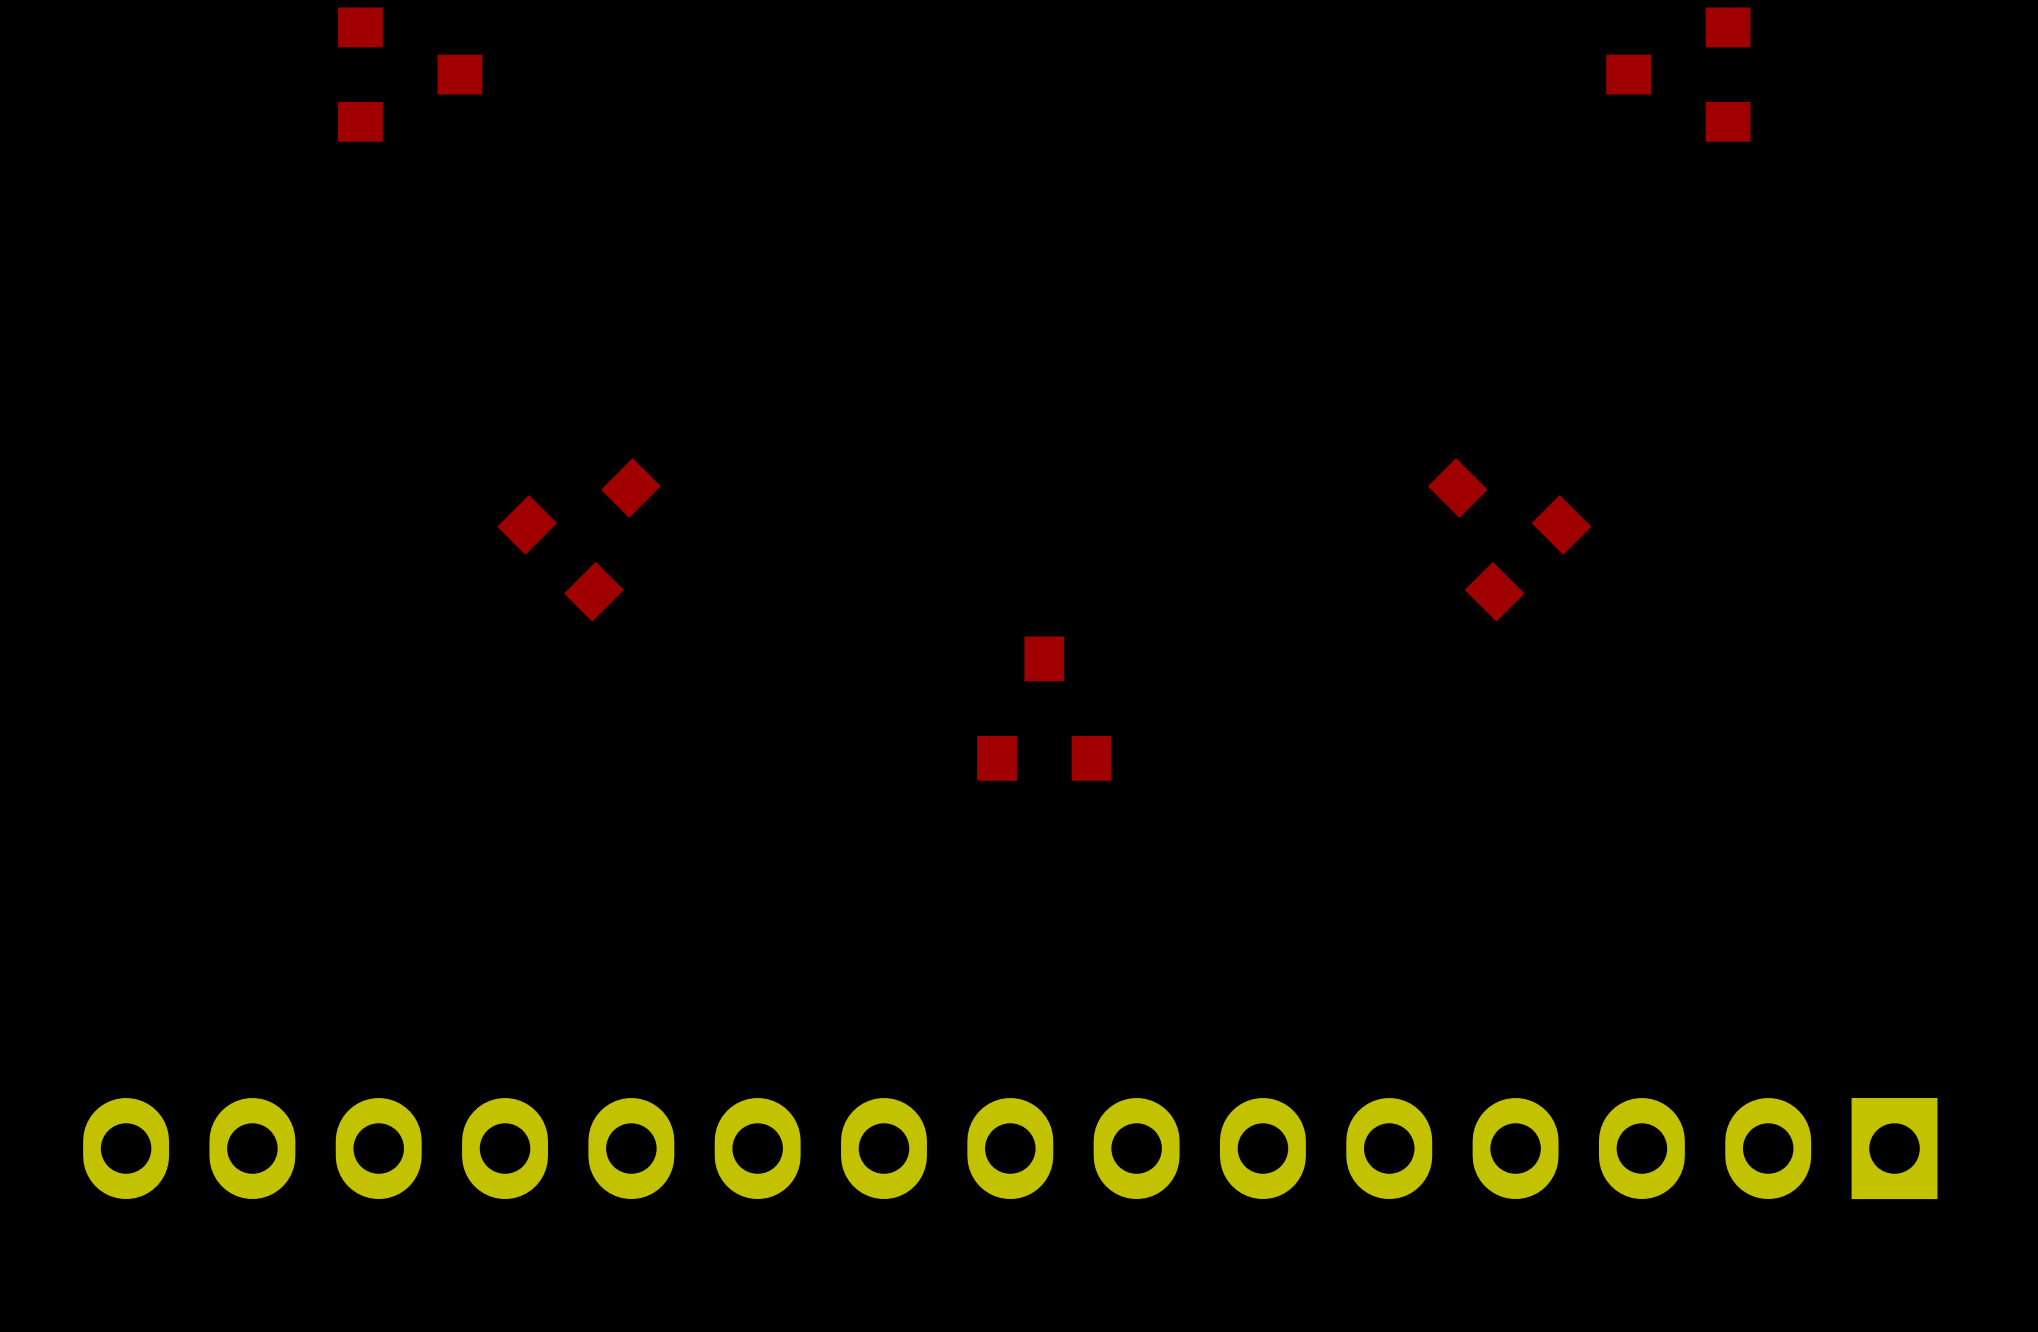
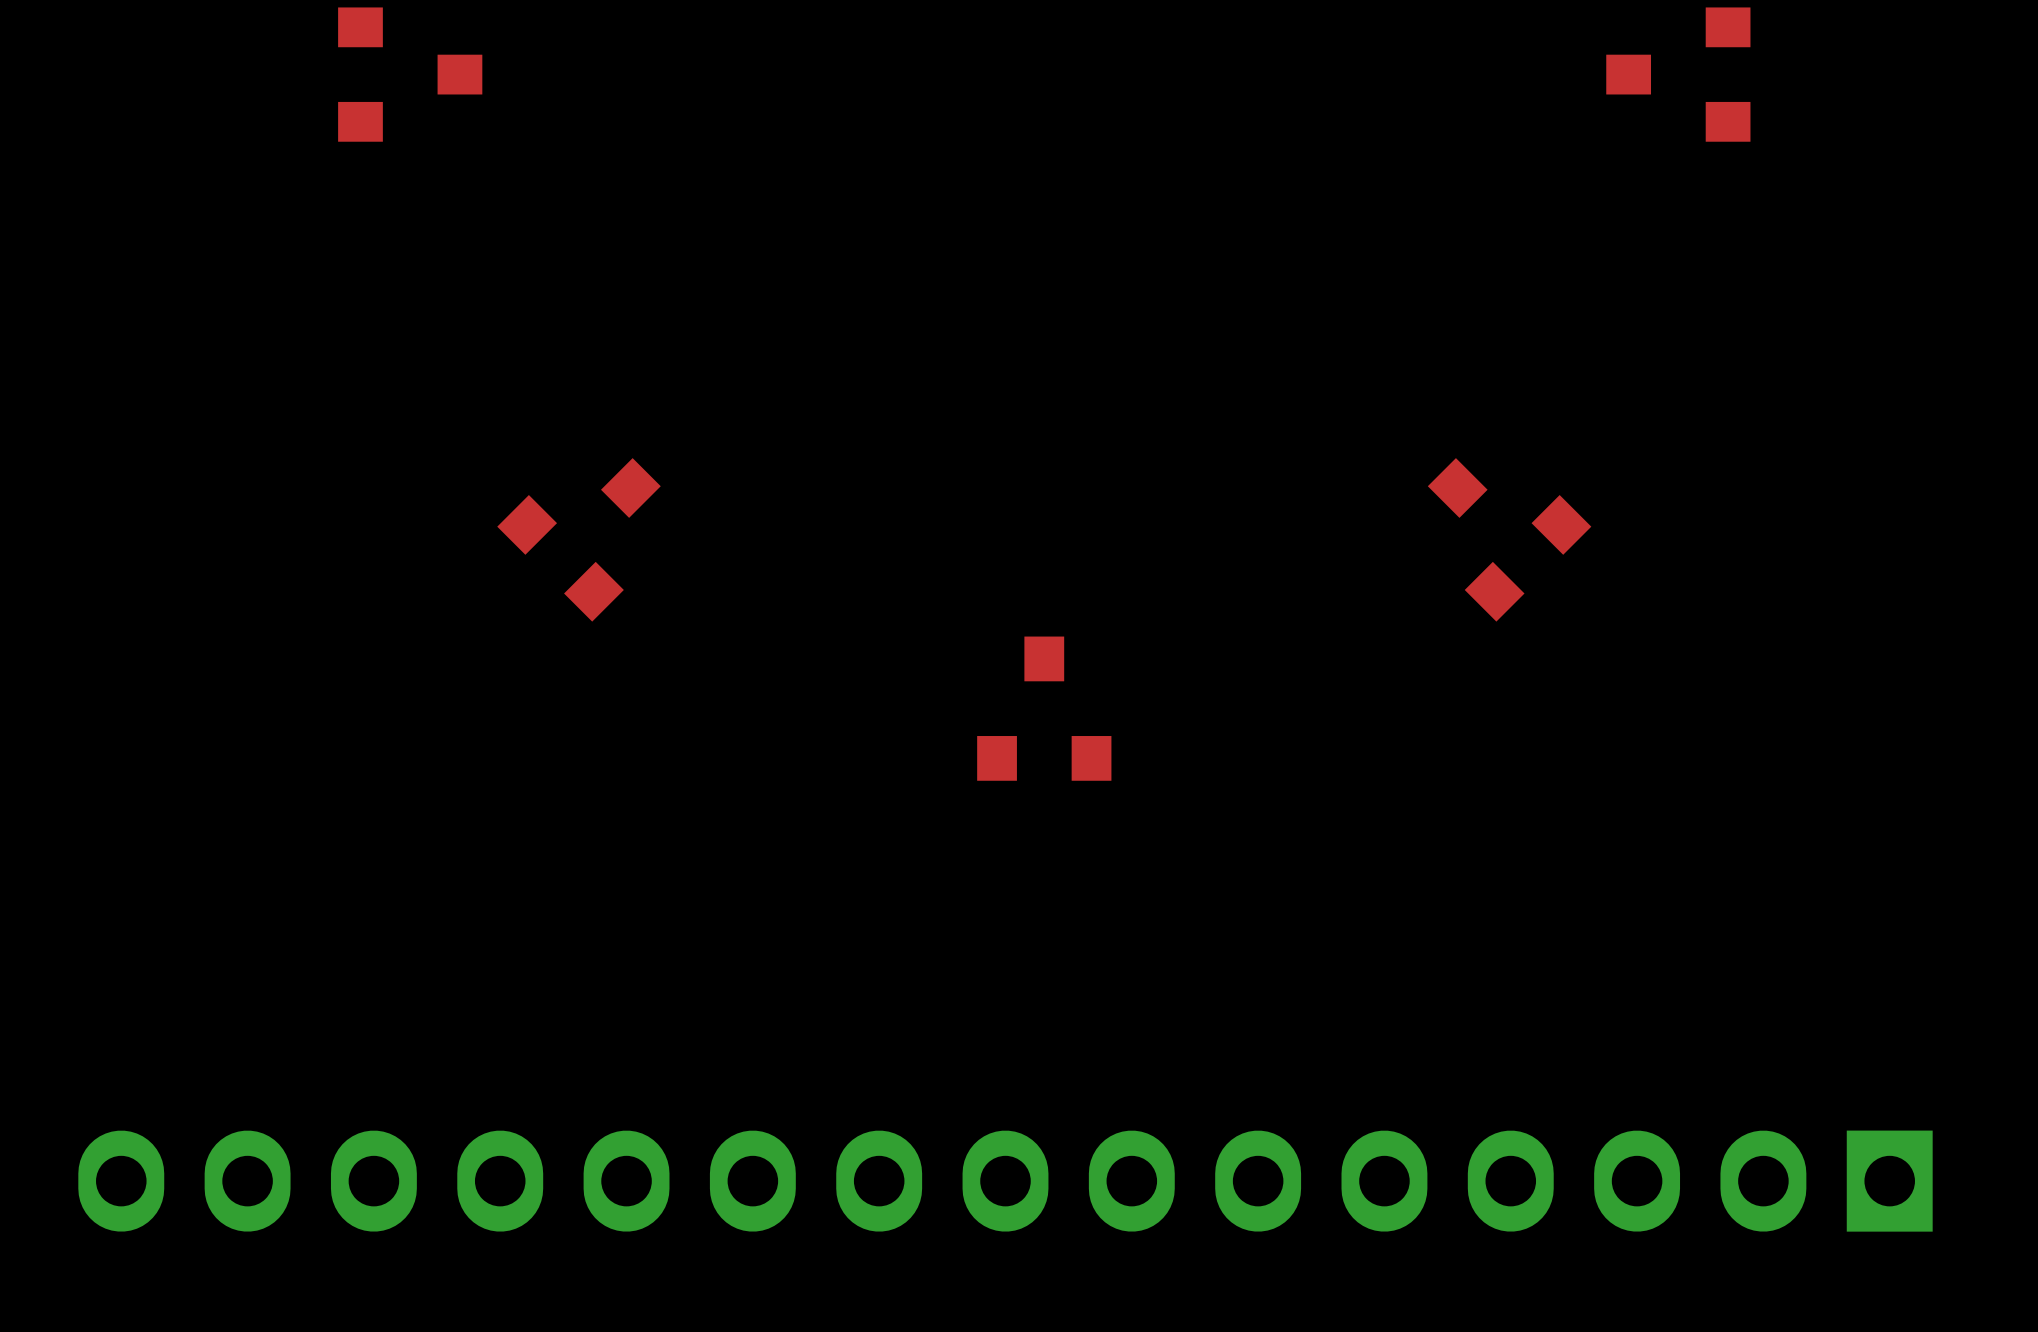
part position: (1010, 1148) -> (1005, 1181)

